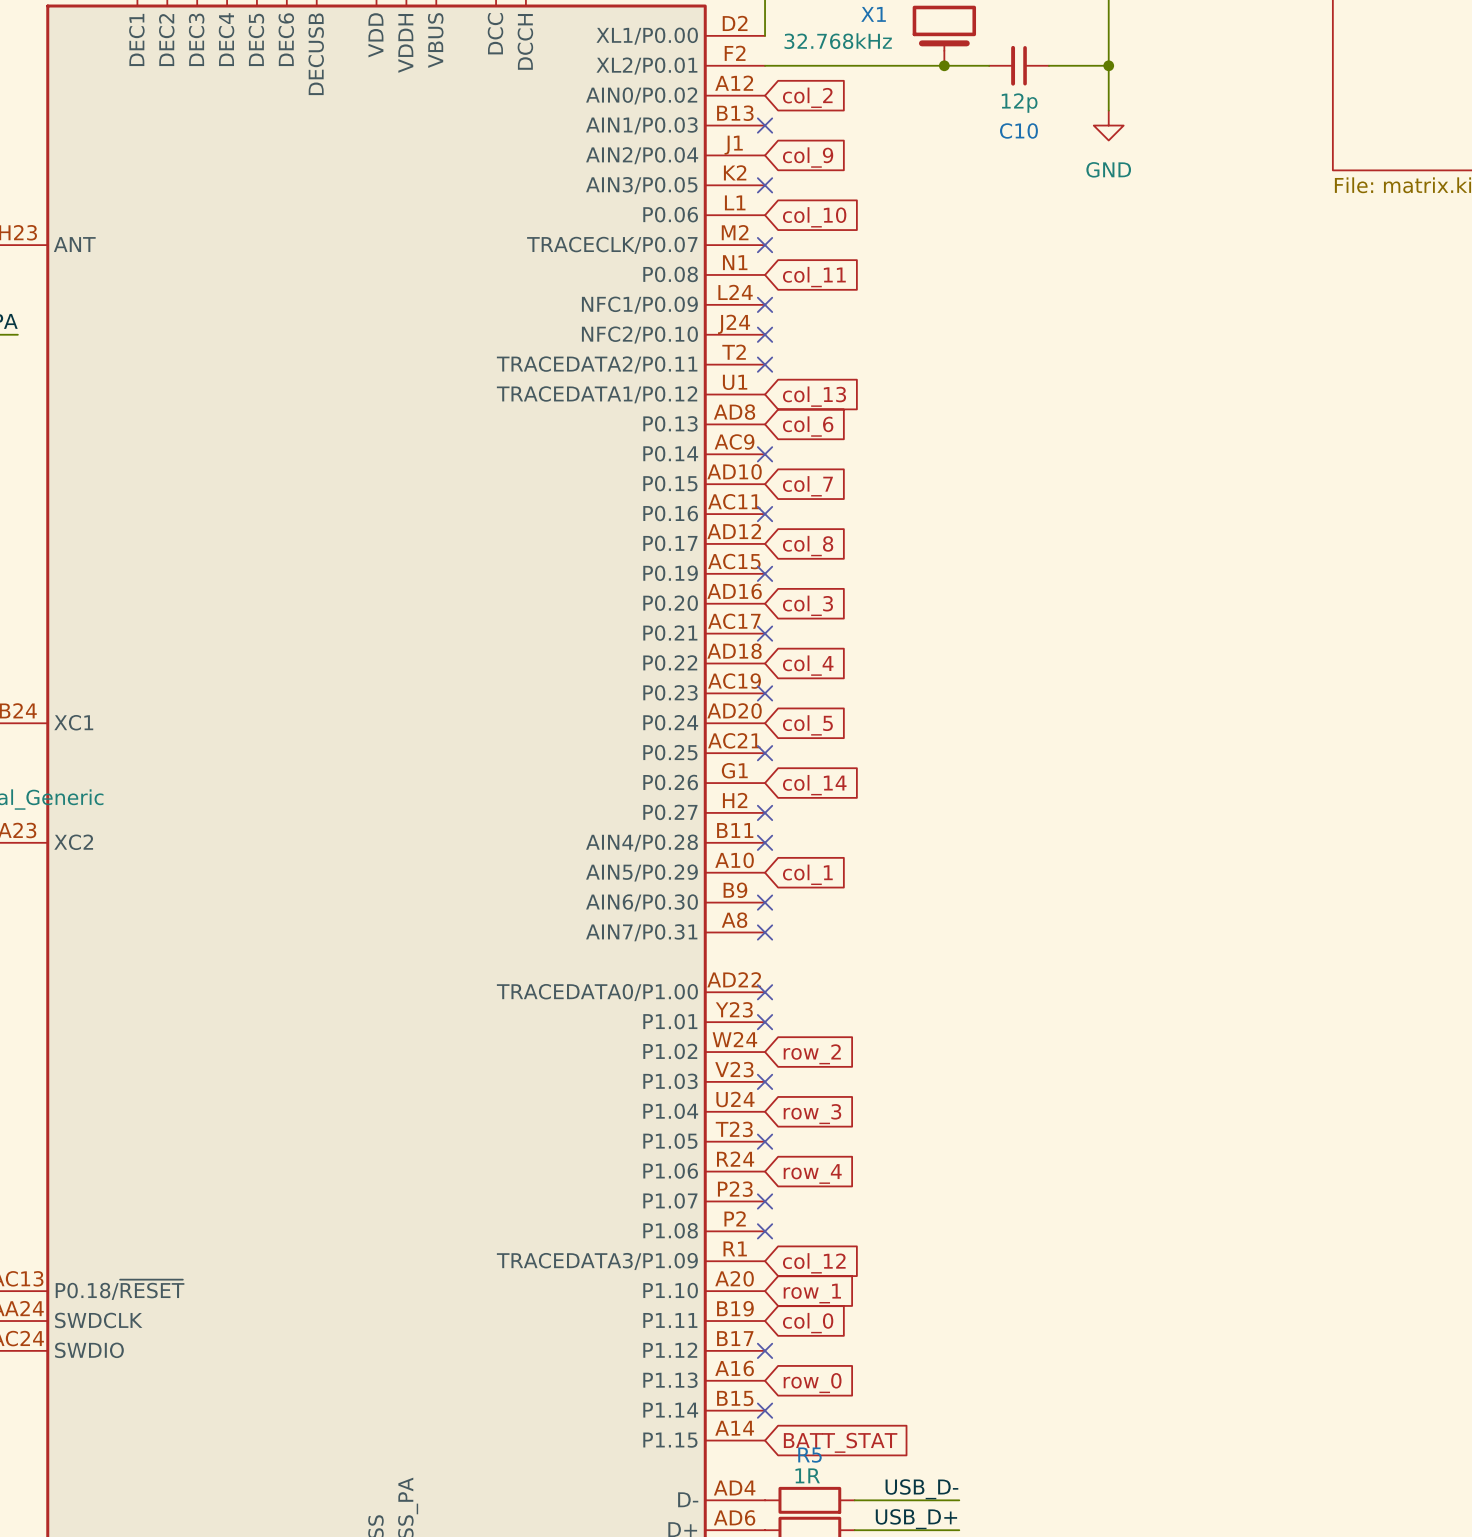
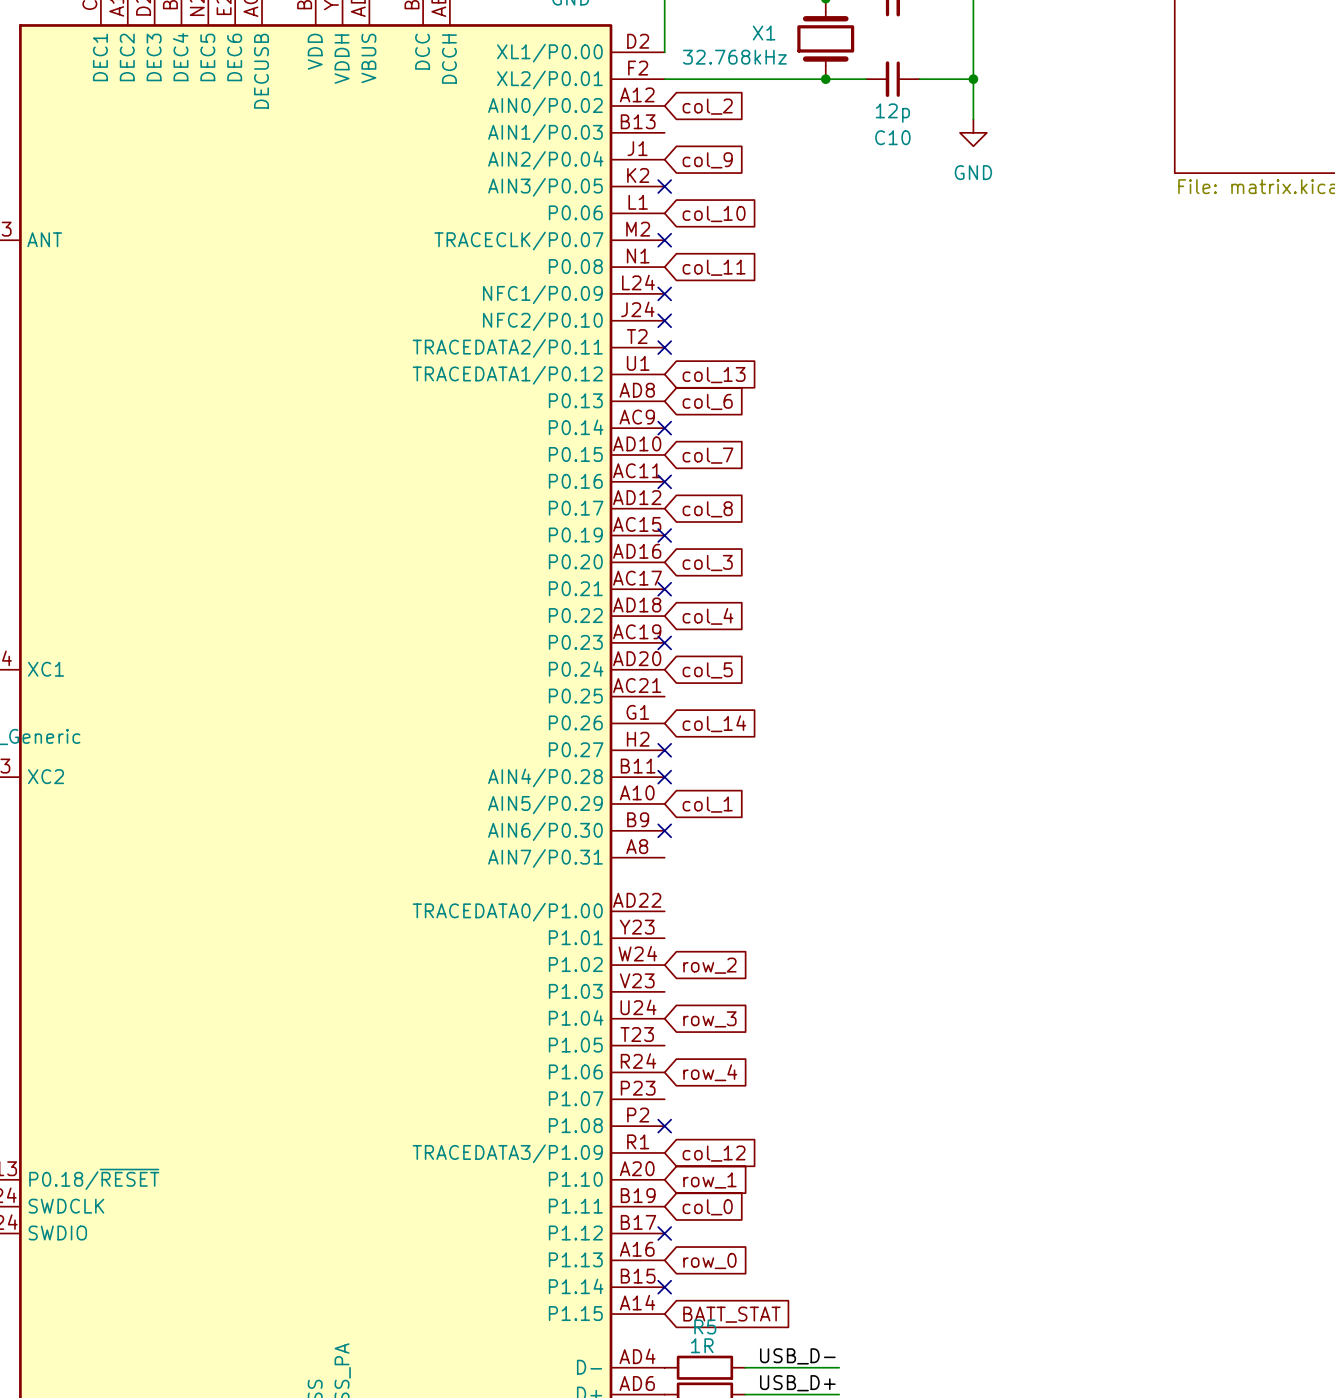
no-connect mark: (765, 125) -> none
no-connect mark: (765, 753) -> none
no-connect mark: (765, 932) -> none
no-connect mark: (765, 992) -> none
no-connect mark: (765, 1022) -> none
no-connect mark: (765, 1081) -> none
no-connect mark: (765, 1141) -> none
no-connect mark: (765, 1201) -> none

